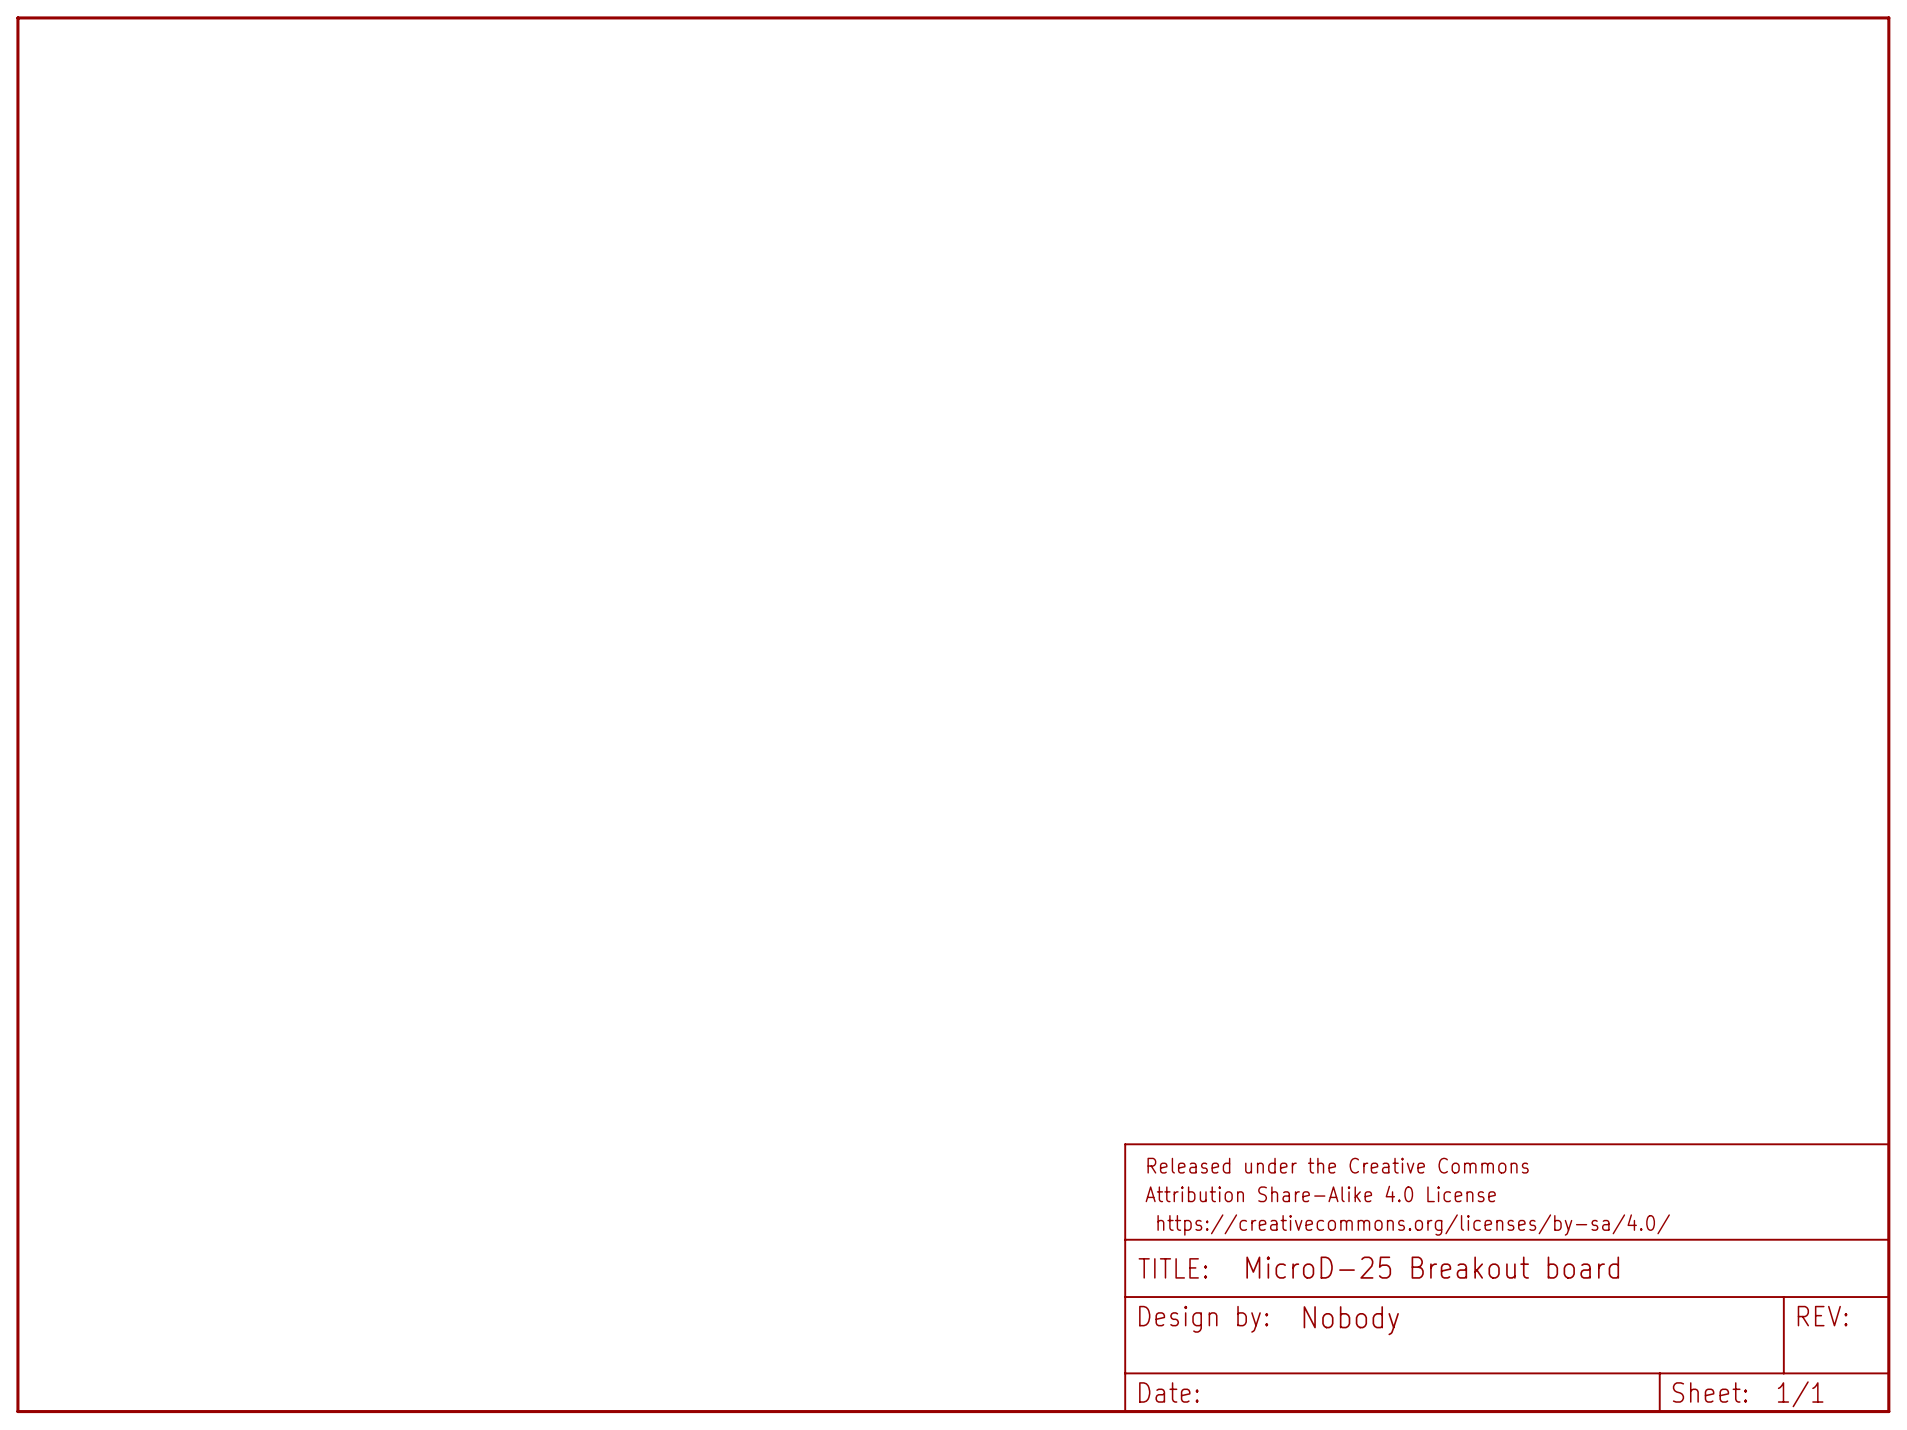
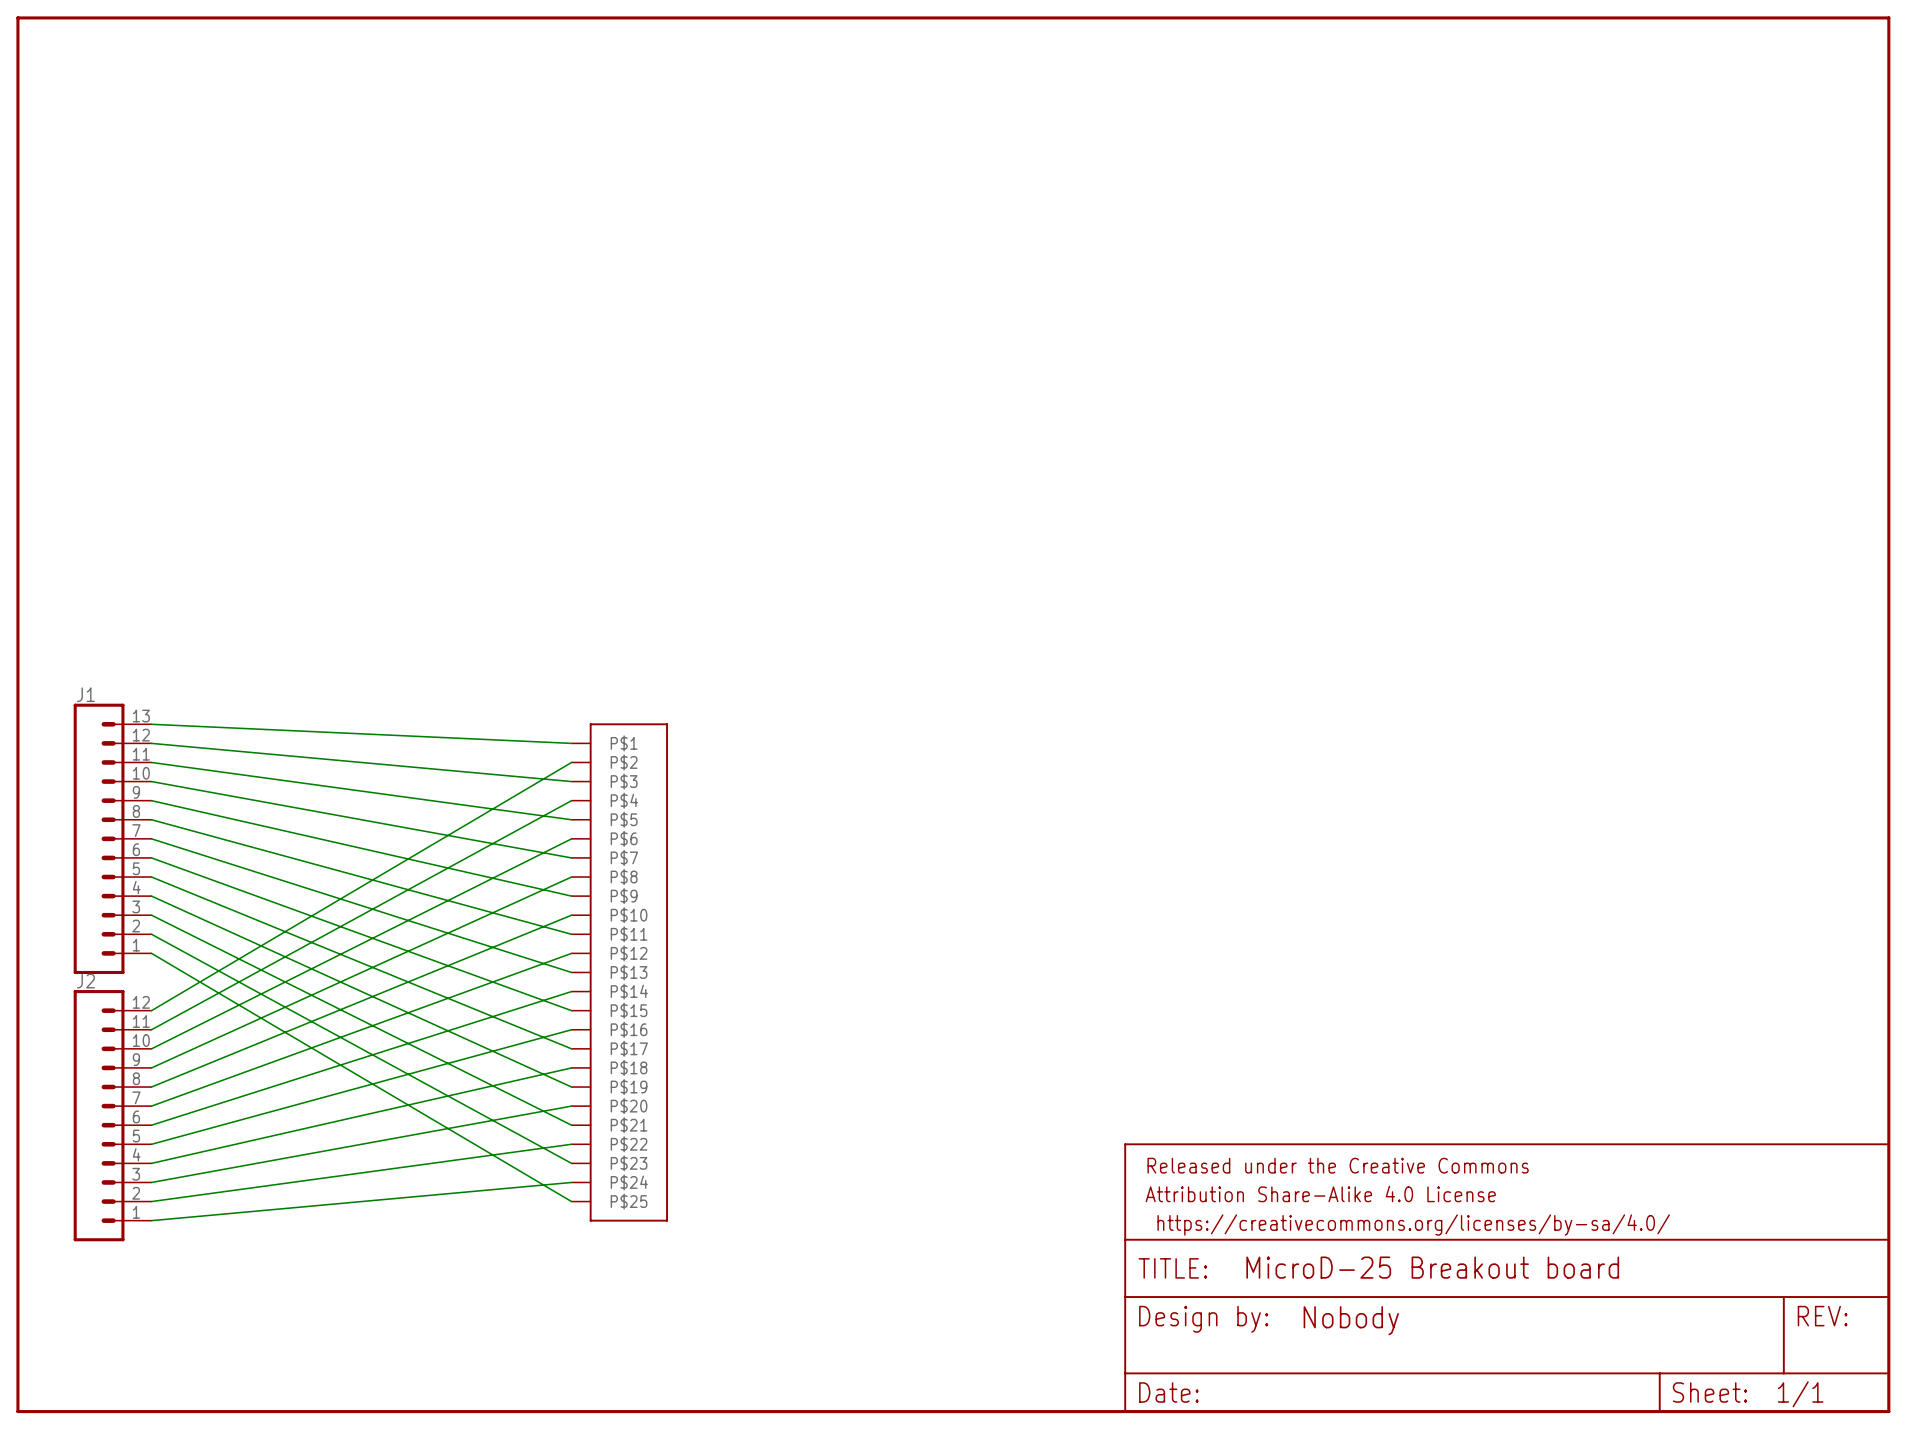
wire: none -> (151, 724) (571, 743)
wire: none -> (151, 743) (571, 781)
wire: none -> (151, 762) (571, 819)
wire: none -> (571, 762) (151, 1010)
wire: none -> (151, 781) (571, 857)
wire: none -> (151, 800) (571, 896)
wire: none -> (571, 800) (151, 1029)
wire: none -> (151, 819) (571, 934)
J1: none -> (112, 838)
wire: none -> (151, 838) (571, 972)
wire: none -> (571, 838) (151, 1048)
wire: none -> (151, 857) (571, 1010)
wire: none -> (151, 877) (571, 1048)
wire: none -> (571, 877) (151, 1067)
wire: none -> (151, 896) (571, 1087)
wire: none -> (151, 915) (571, 1125)
wire: none -> (571, 915) (151, 1087)
wire: none -> (151, 934) (571, 1163)
wire: none -> (151, 953) (571, 1201)
wire: none -> (571, 953) (151, 1106)
part: none -> (619, 972)
wire: none -> (571, 991) (151, 1125)
wire: none -> (571, 1029) (151, 1144)
wire: none -> (571, 1067) (151, 1163)
wire: none -> (571, 1106) (151, 1182)
J2: none -> (112, 1115)
wire: none -> (571, 1144) (151, 1201)
wire: none -> (571, 1182) (151, 1220)

